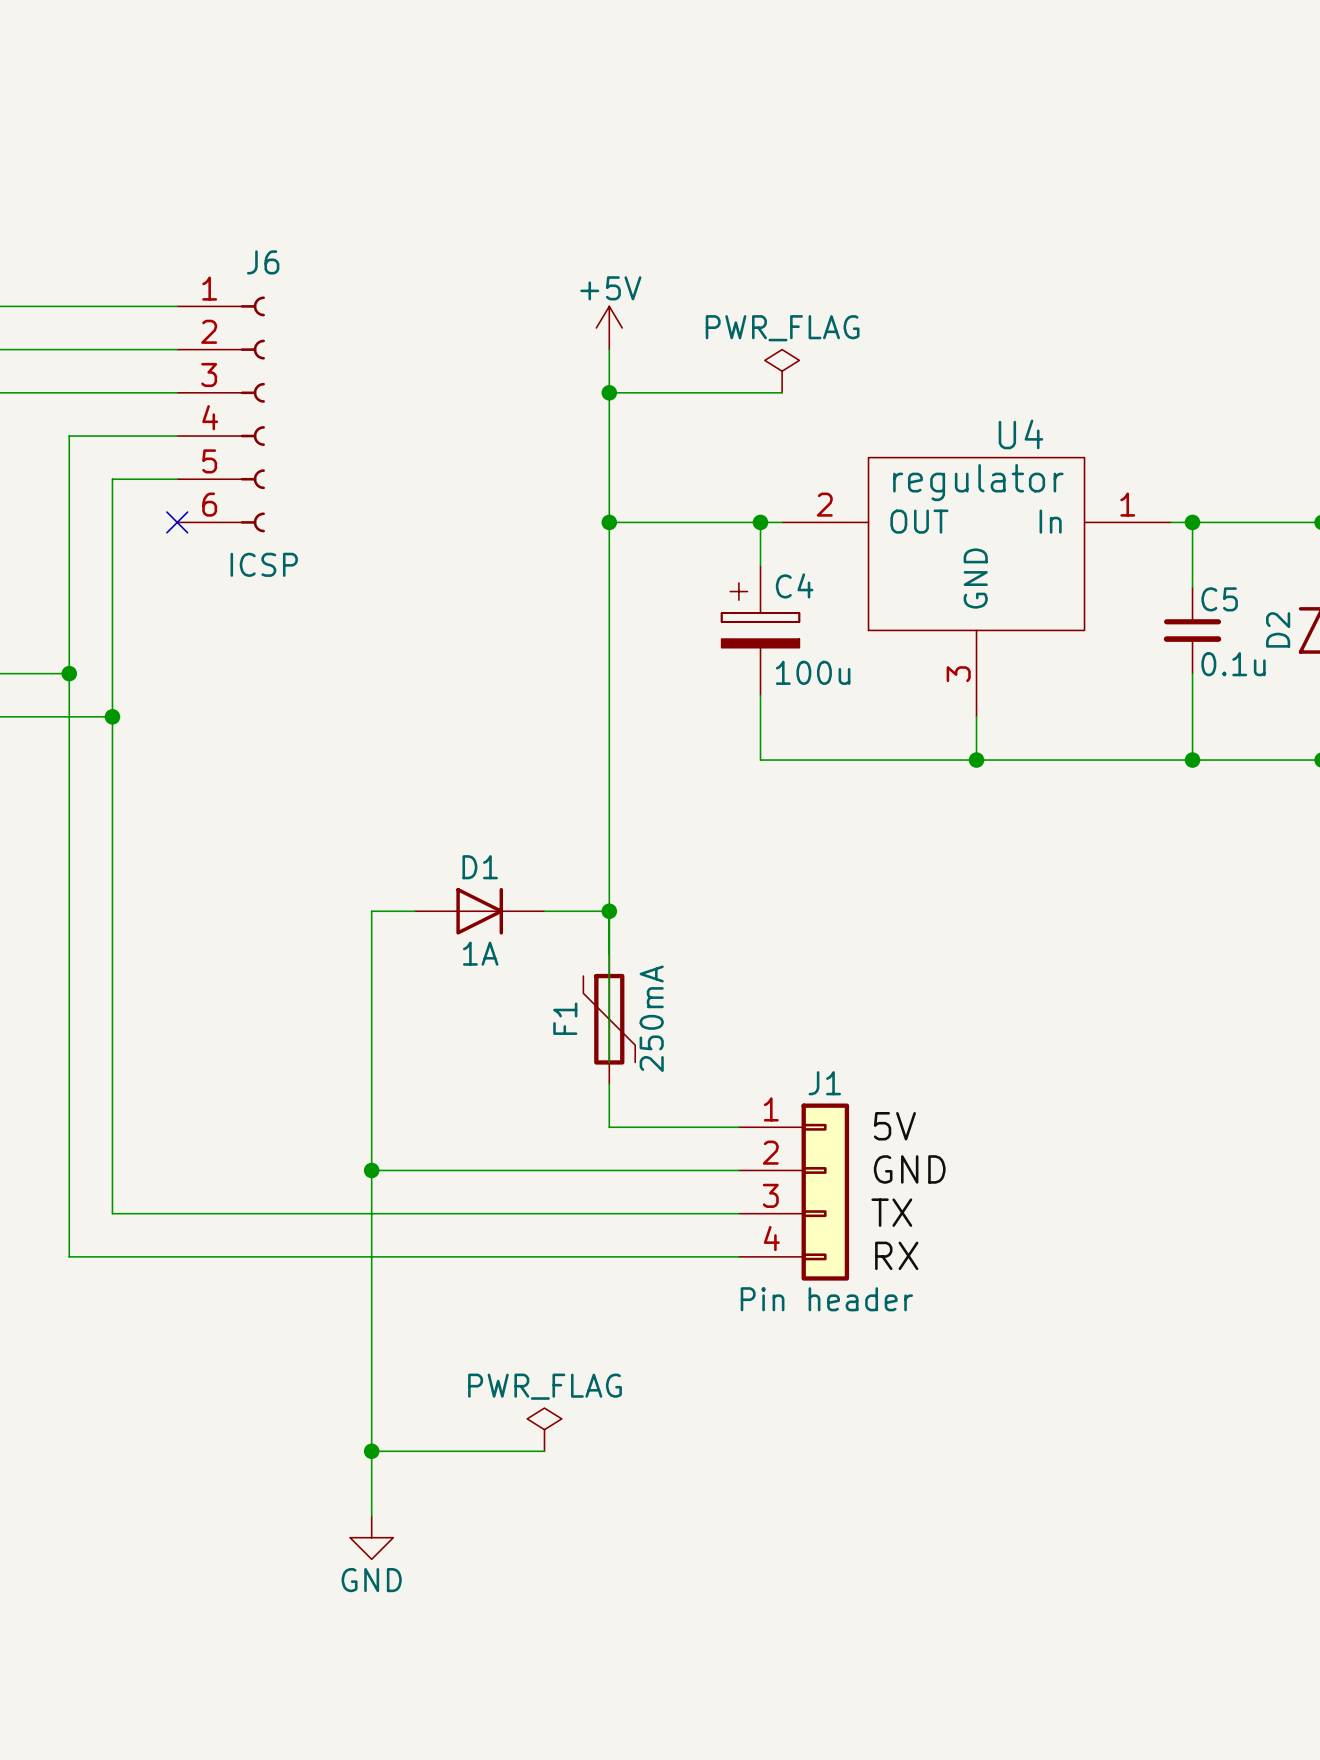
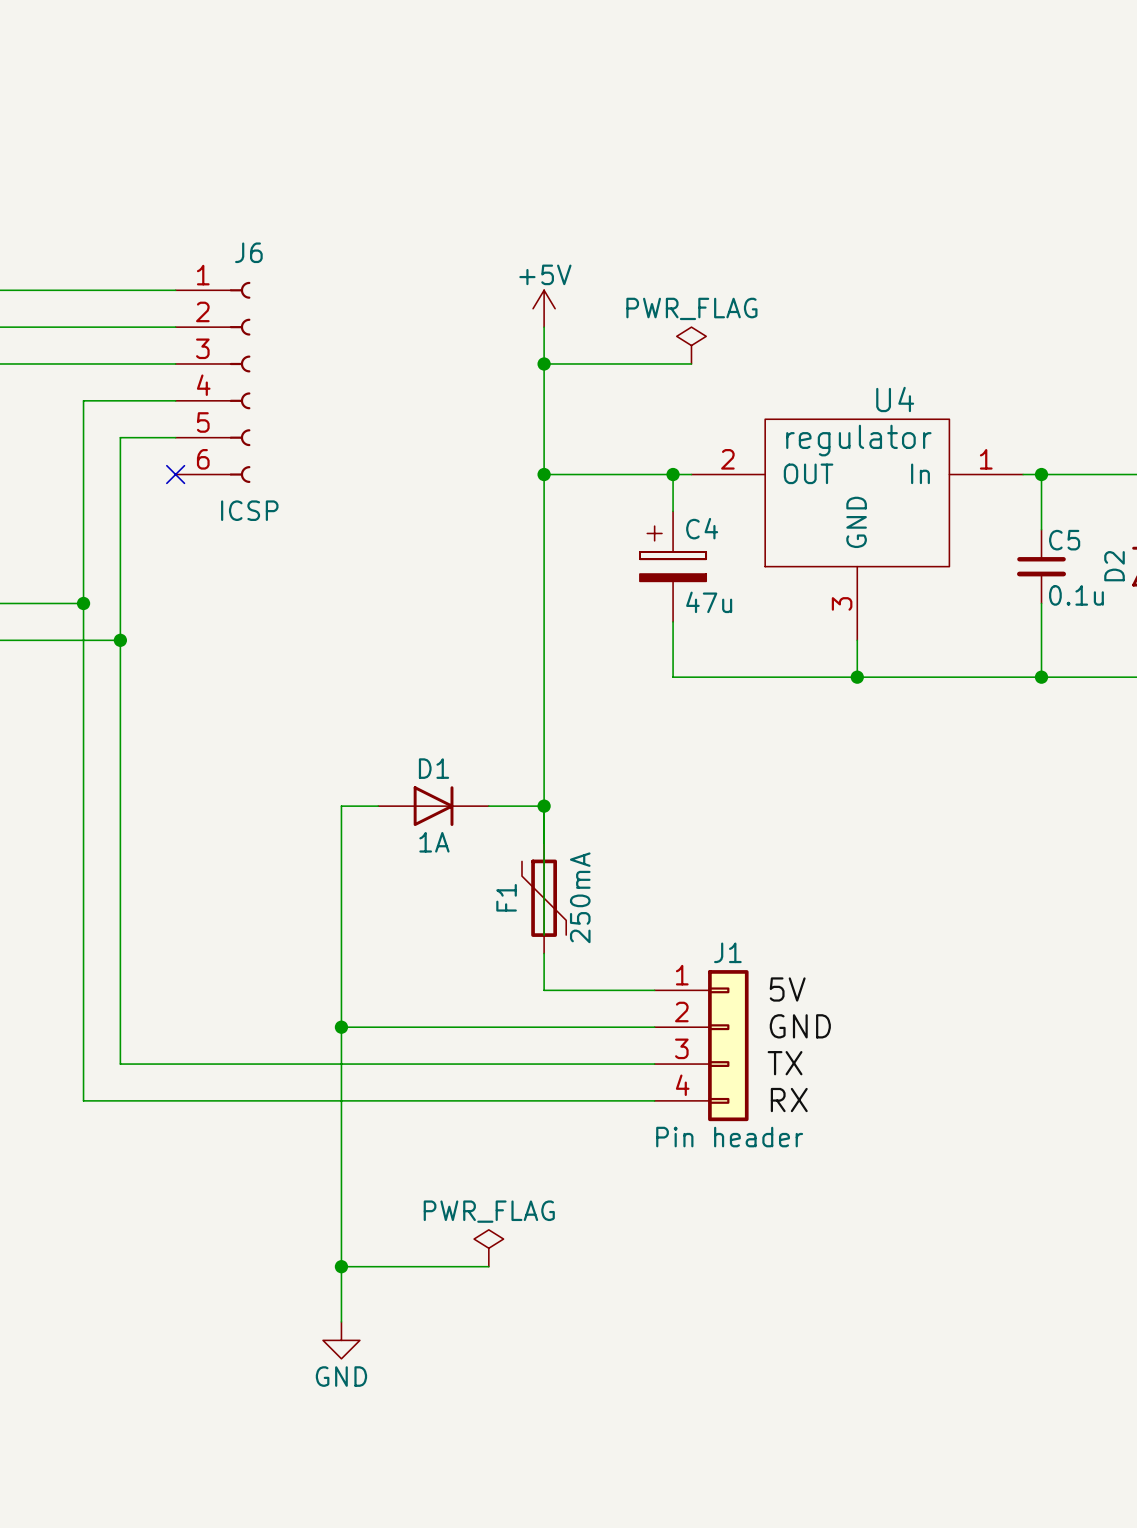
C4 value: 100u (813, 672) -> 47u (709, 602)

